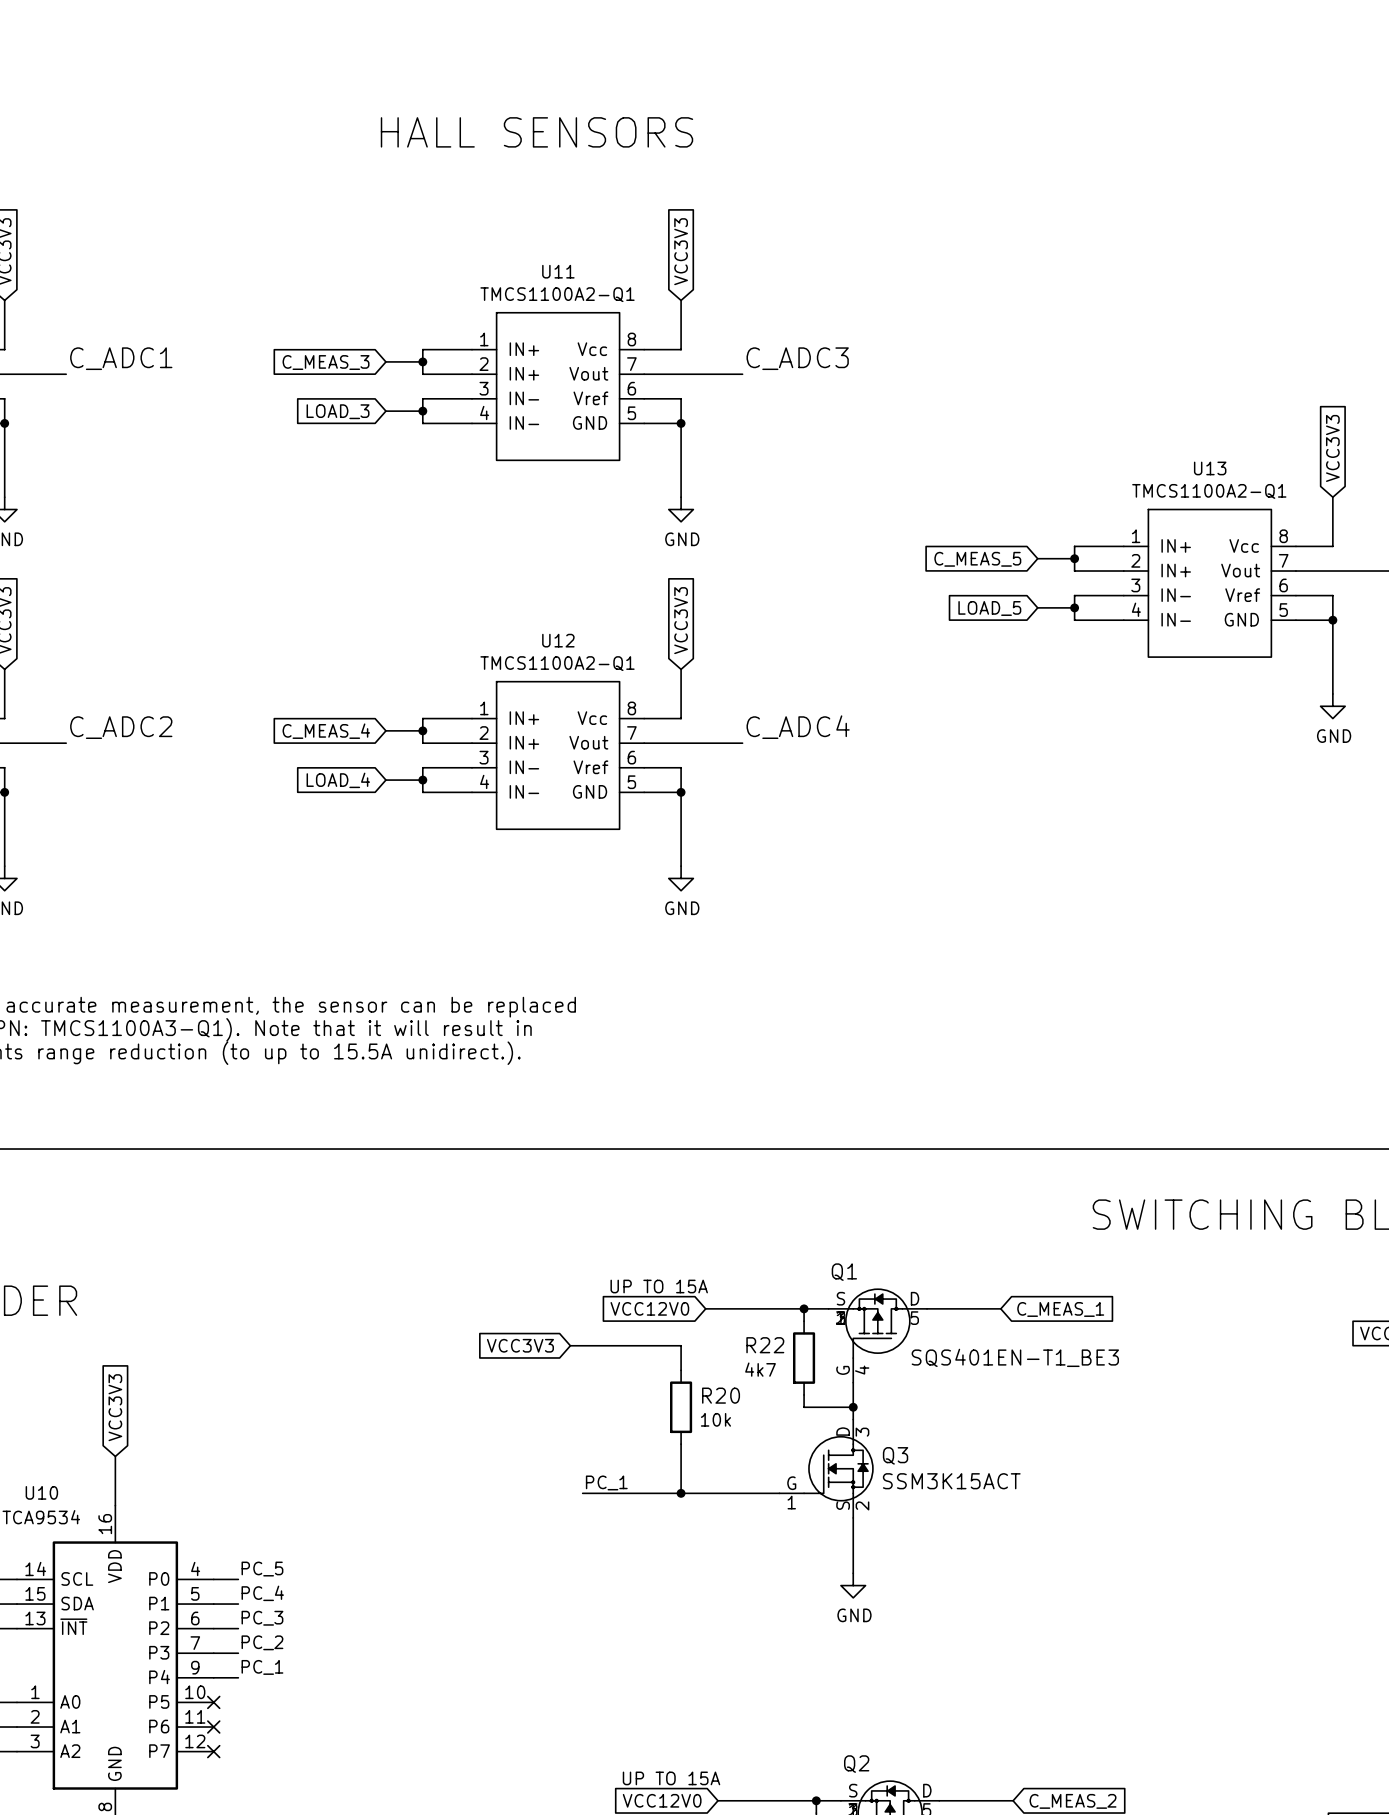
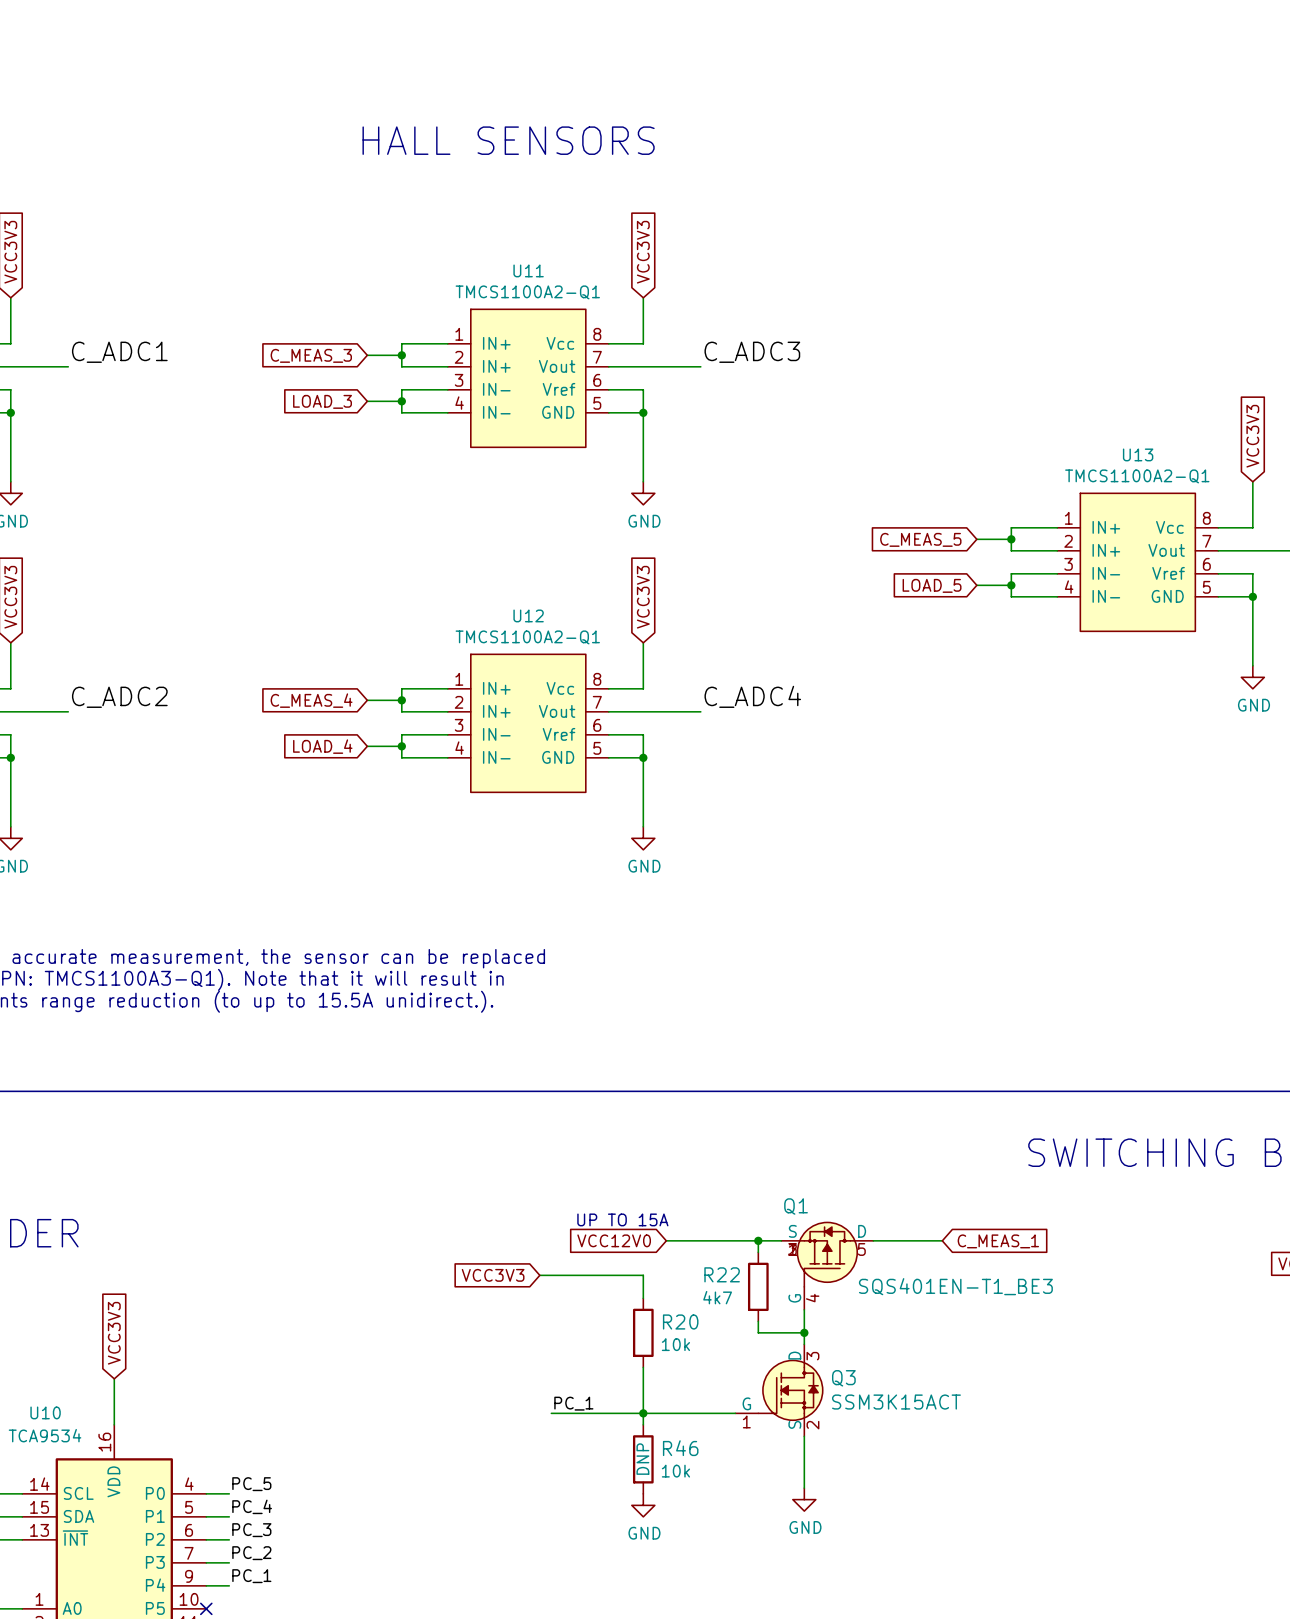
wire: none -> (643, 1413) (643, 1424)
R46: none -> (643, 1459)
power symbol: none -> GND (643, 1505)

